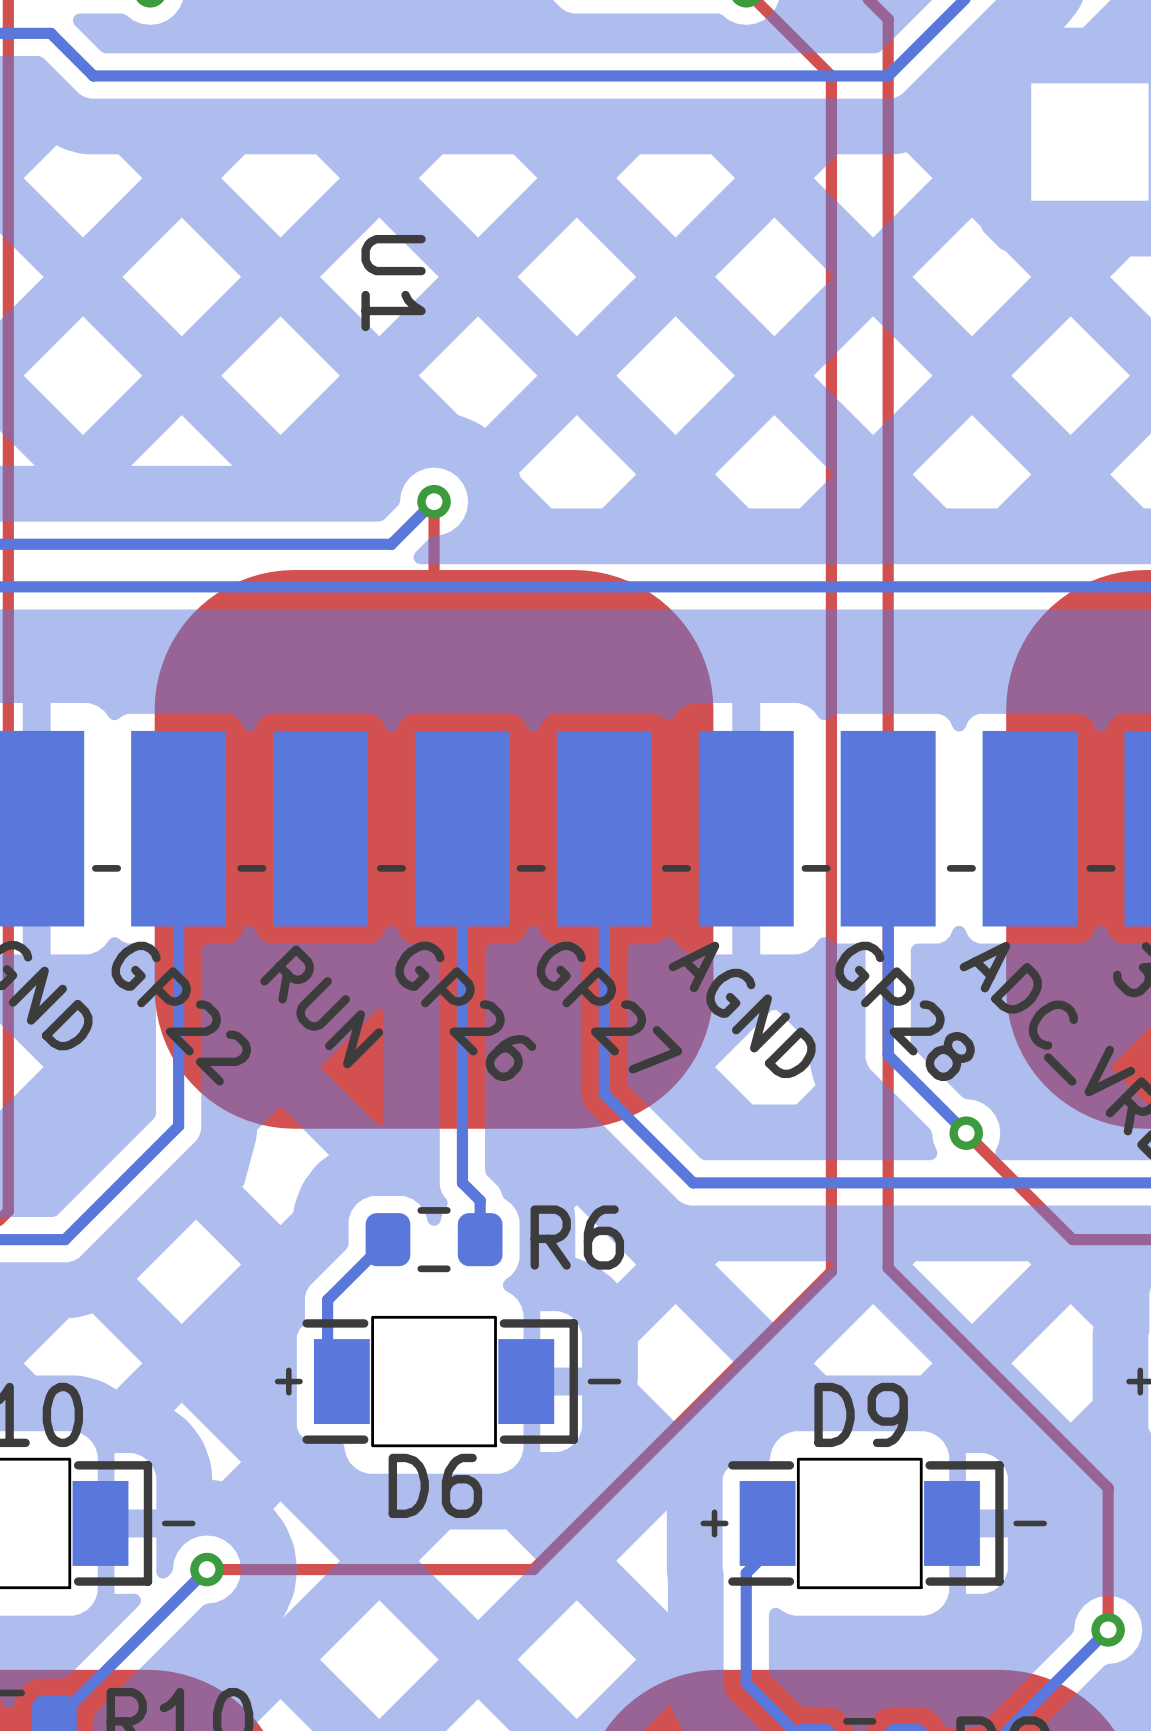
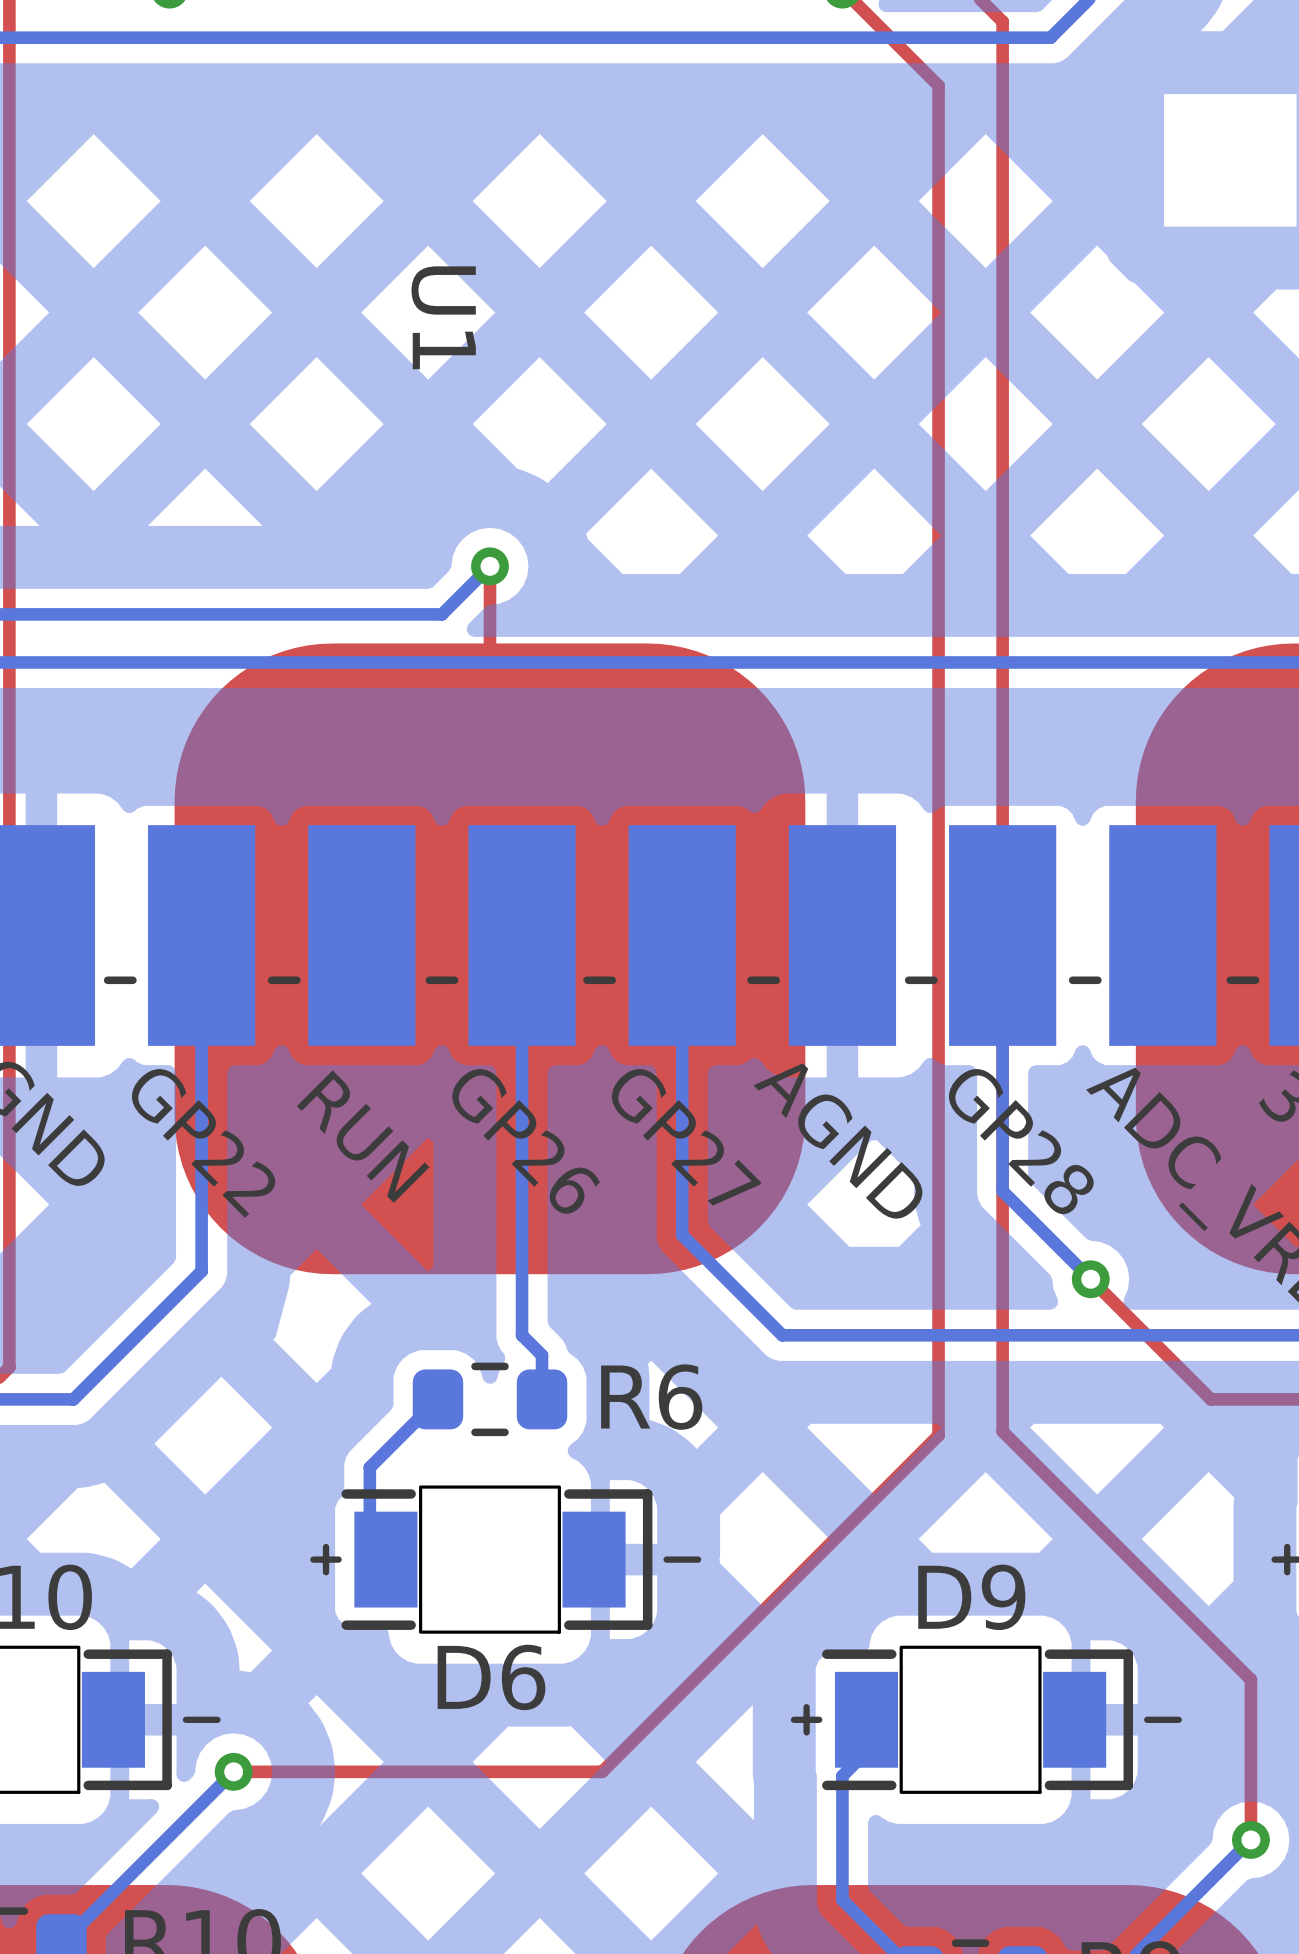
bottom track: (930, 33) (888, 75) (93, 75) (50, 33) -> (1050, 37) (57, 37)

